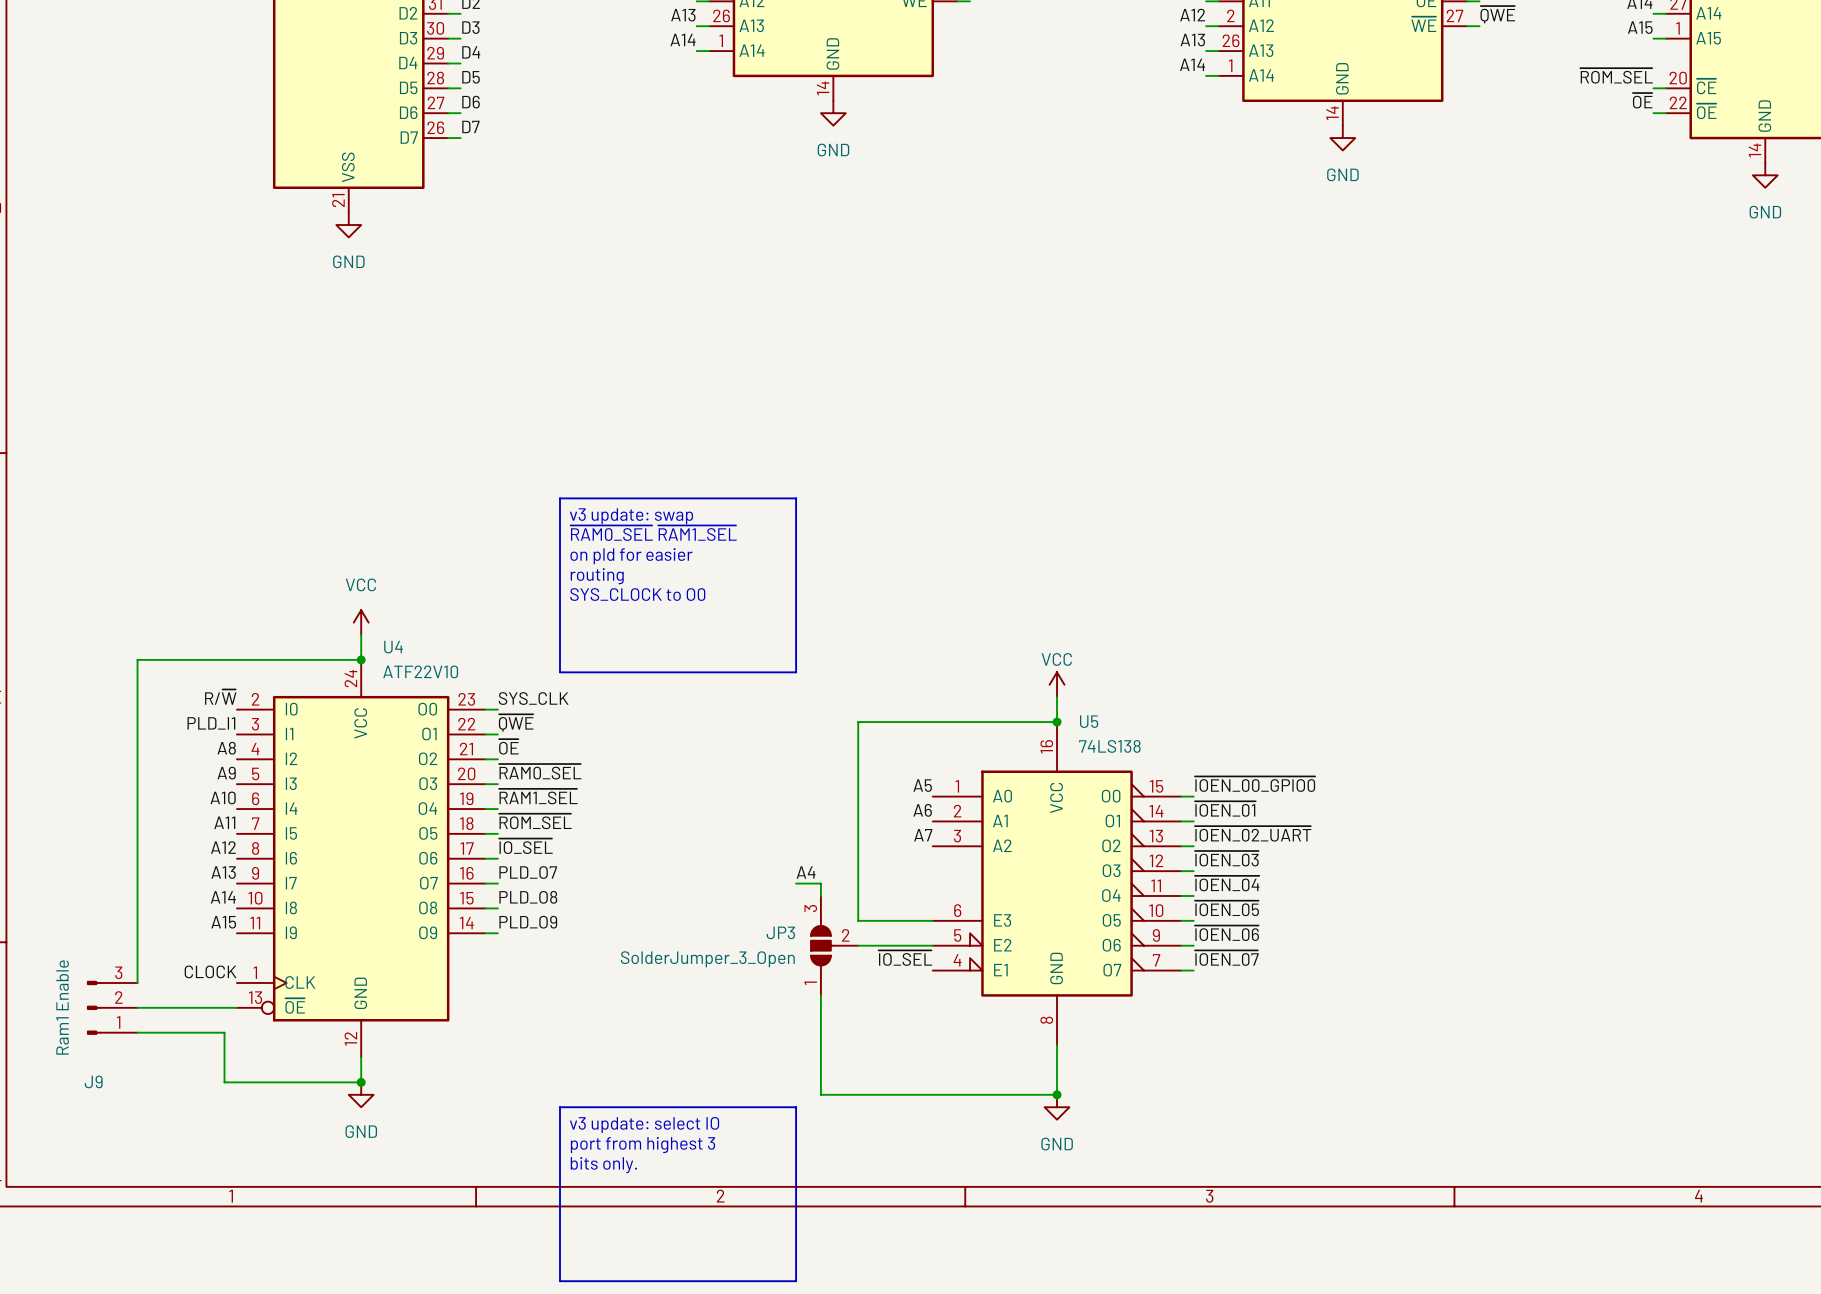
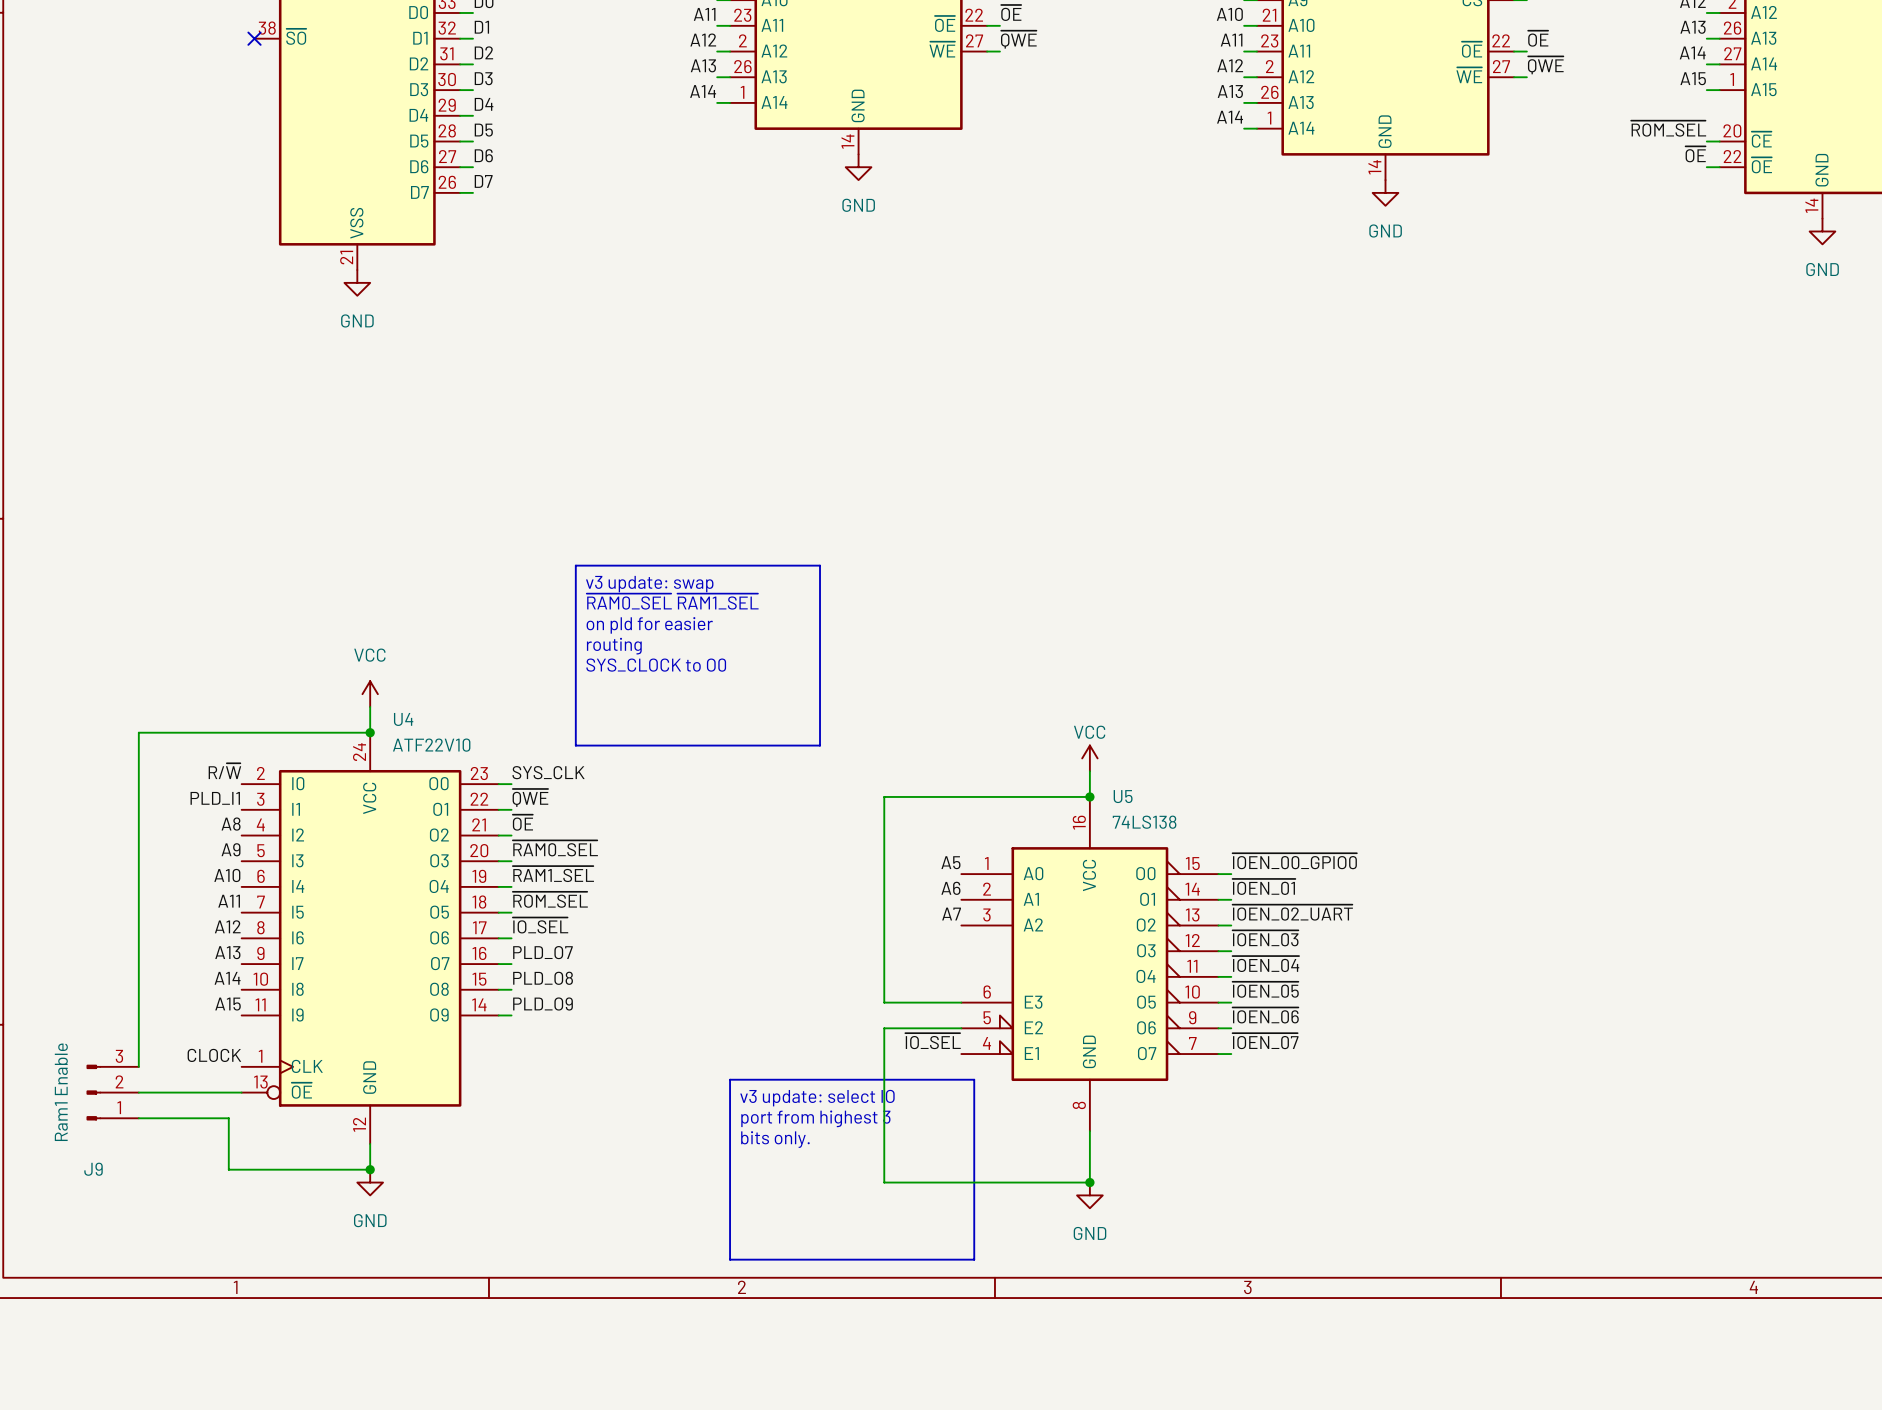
label: A4 (806, 872) -> none
wire: (796, 883) (820, 883) (820, 896) -> none
JP3: SolderJumper_3_Open (834, 945) -> none
wire: (820, 995) (820, 1094) (858, 1094) -> (884, 1028) (884, 1182)
line: (560, 1107) (796, 1107) (796, 1281) (560, 1281) (560, 1107) -> (730, 1079) (974, 1079) (974, 1259) (730, 1259) (730, 1079)
text position: v3 update: select IO (644, 1125) -> v3 update: select IO (817, 1098)
text position: port from highest 3 (642, 1145) -> port from highest 3 (815, 1118)
text position: bits only. (603, 1165) -> bits only. (775, 1139)

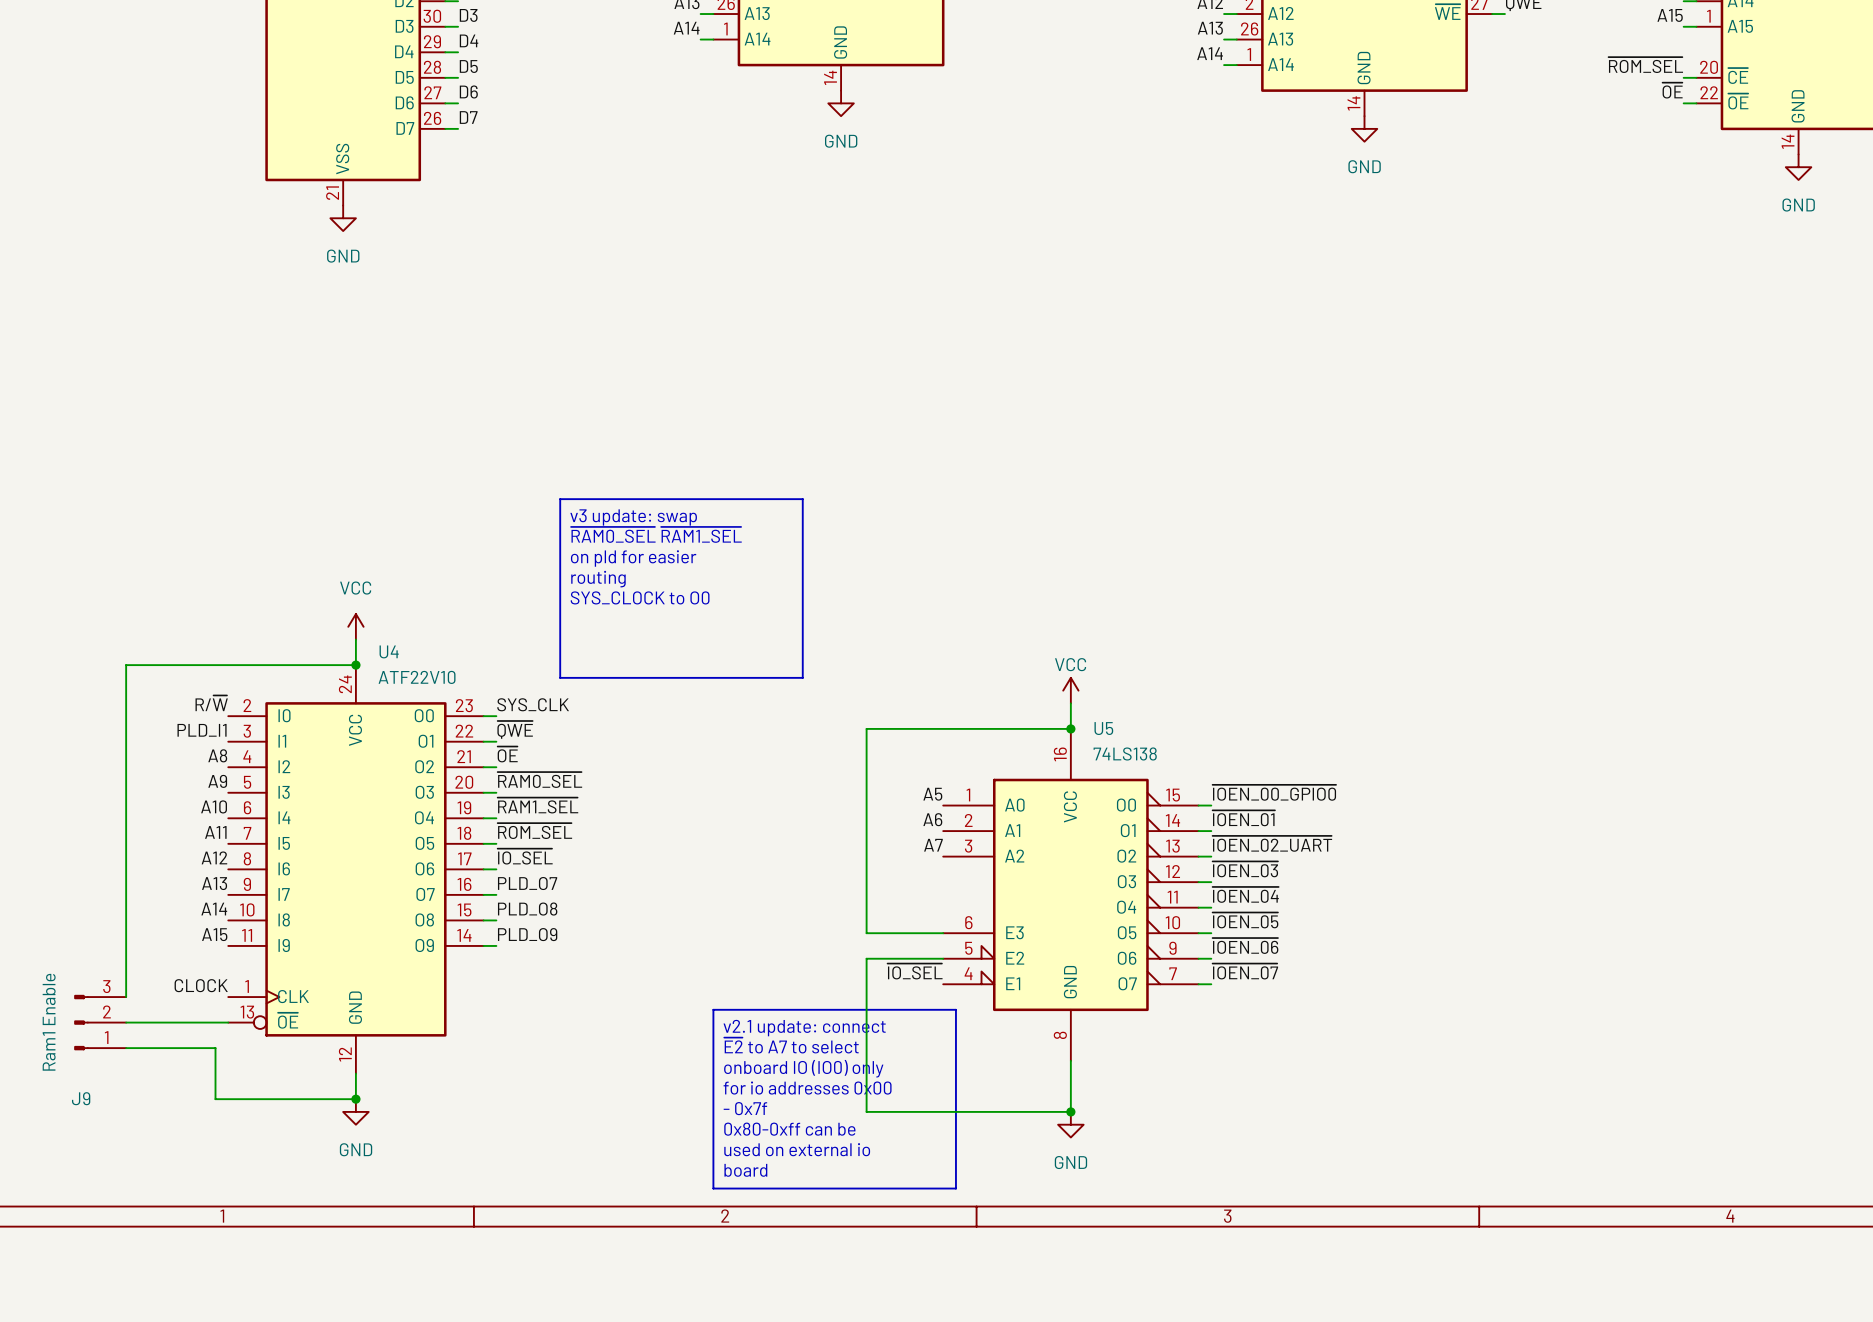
text: v3 update: select IO (817, 1098) -> v2.1 update: connect (804, 1028)
text: port from highest 3 (815, 1118) -> ~{E2} to A7 to select (791, 1045)
text: bits only. (775, 1139) -> onboard IO (IO0) only (803, 1068)
text: none -> for io addresses 0x00 (807, 1088)
text: none -> - 0x7f (745, 1108)
text: none -> 0x80-0xff can be (789, 1129)
text: none -> used on external io (797, 1149)
text: none -> board (745, 1170)

